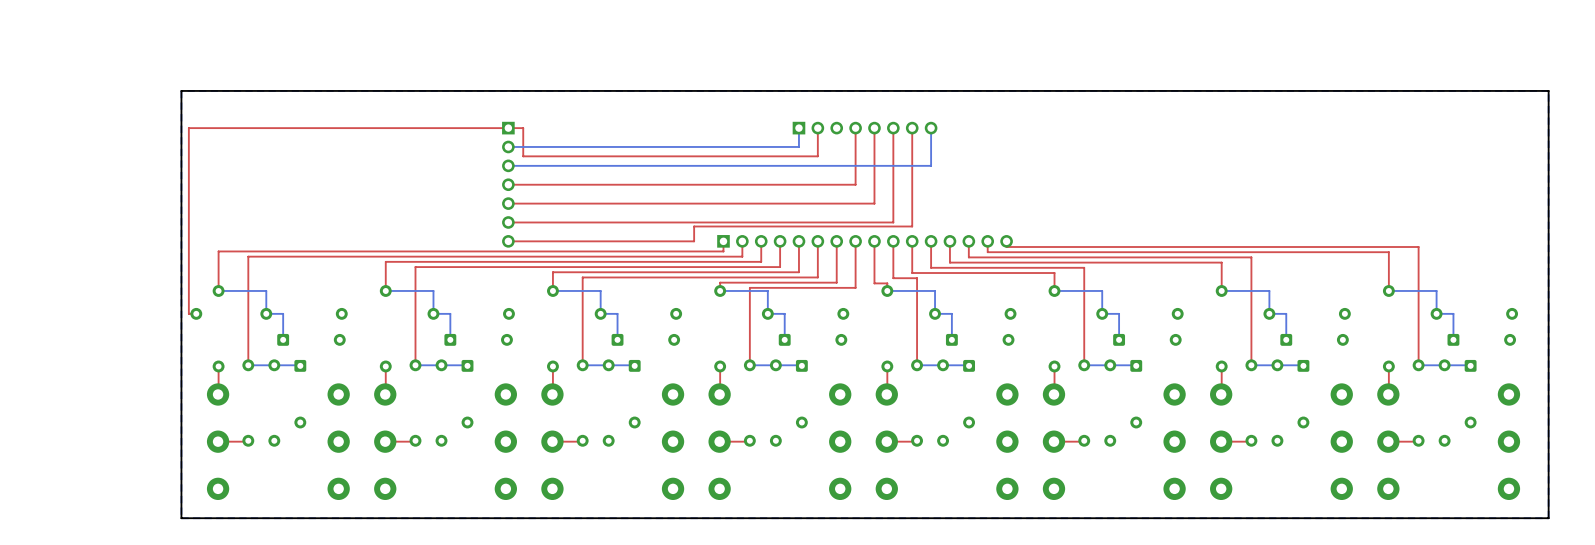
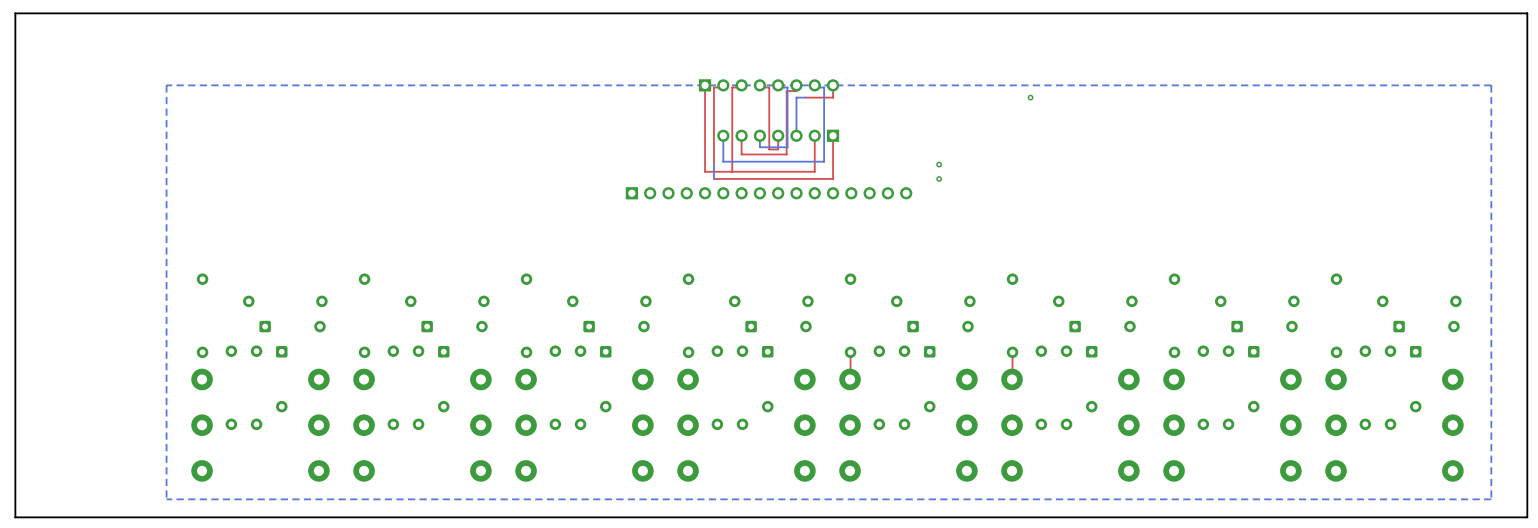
top track: none -> (705, 85) (705, 171) (814, 171) (814, 135)
top track: none -> (723, 85) (723, 87) (713, 87) (713, 164)
top track: none -> (741, 85) (741, 87) (732, 87) (732, 171)
top track: none -> (759, 85) (759, 87) (769, 87) (769, 149) (778, 149) (778, 135)
bottom track: none -> (778, 85) (778, 87) (787, 87) (787, 147) (759, 147) (759, 135)
top track: none -> (796, 85) (796, 91) (786, 91) (786, 154) (741, 154) (741, 135)
bottom track: none -> (814, 85) (814, 87) (824, 87) (824, 161) (723, 161) (723, 135)
top track: none -> (833, 85) (833, 97) (805, 97)
board edge: (1548, 90) (181, 90) (181, 518) (1548, 518) (1548, 90) -> (1527, 13) (1527, 517) (15, 517) (15, 13) (1527, 13)
bottom track: none -> (805, 97) (796, 97) (796, 135)
via: none -> (1030, 97)
bottom track: (798, 128) (798, 146) (508, 146) -> none
top track: (817, 128) (817, 156) (523, 156) (523, 128) (188, 128) (188, 313) (196, 313) -> none
top track: (855, 128) (855, 184) (508, 184) -> none
part position: (865, 128) -> (769, 85)
top track: (874, 128) (874, 203) (508, 203) -> none
top track: (893, 128) (893, 222) (508, 222) -> none
top track: (912, 128) (912, 226) (694, 226) (694, 241) (508, 241) -> none
bottom track: (931, 128) (931, 165) (508, 165) -> none
part: none -> (778, 135)
top track: none -> (833, 135) (833, 178) (713, 178)
bottom track: none -> (713, 164) (713, 178)
via: none -> (939, 164)
part: (508, 184) -> none
via: none -> (939, 178)
top track: (723, 241) (723, 251) (218, 251) (218, 290) -> none
top track: (742, 241) (742, 256) (248, 256) (248, 365) -> none
top track: (761, 241) (761, 261) (385, 261) (385, 290) -> none
top track: (780, 241) (780, 267) (415, 267) (415, 365) -> none
top track: (798, 241) (798, 272) (552, 272) (552, 290) -> none
top track: (817, 241) (817, 277) (582, 277) (582, 365) -> none
top track: (836, 241) (836, 282) (720, 282) (720, 290) -> none
top track: (855, 241) (855, 287) (749, 287) (749, 365) -> none
part position: (865, 241) -> (769, 193)
top track: (874, 241) (874, 283) (887, 283) (887, 290) -> none
top track: (893, 241) (893, 278) (917, 278) (917, 365) -> none
top track: (912, 241) (912, 273) (1054, 273) (1054, 290) -> none
top track: (931, 241) (931, 267) (1084, 267) (1084, 365) -> none
top track: (949, 241) (949, 262) (1221, 262) (1221, 290) -> none
top track: (968, 241) (968, 257) (1251, 257) (1251, 365) -> none
top track: (987, 241) (987, 252) (1388, 252) (1388, 290) -> none
top track: (1006, 241) (1006, 246) (1418, 246) (1418, 365) -> none
bottom track: (218, 290) (266, 290) (266, 313) (283, 313) (283, 339) -> none
bottom track: (385, 290) (433, 290) (433, 313) (450, 313) (450, 339) -> none
bottom track: (552, 290) (600, 290) (600, 313) (617, 313) (617, 339) -> none
bottom track: (720, 290) (767, 290) (767, 313) (784, 313) (784, 339) -> none
bottom track: (887, 290) (935, 290) (935, 313) (951, 313) (951, 339) -> none
bottom track: (1054, 290) (1102, 290) (1102, 313) (1119, 313) (1119, 339) -> none
bottom track: (1221, 290) (1269, 290) (1269, 313) (1286, 313) (1286, 339) -> none
bottom track: (1388, 290) (1436, 290) (1436, 313) (1453, 313) (1453, 339) -> none
part: (196, 313) -> none
bottom track: (248, 365) (300, 365) -> none
bottom track: (415, 365) (467, 365) -> none
bottom track: (582, 365) (634, 365) -> none
bottom track: (749, 365) (801, 365) -> none
bottom track: (917, 365) (969, 365) -> none
bottom track: (1084, 365) (1136, 365) -> none
bottom track: (1251, 365) (1303, 365) -> none
bottom track: (1418, 365) (1470, 365) -> none
top track: (218, 366) (218, 394) -> none
top track: (385, 366) (385, 394) -> none
top track: (552, 366) (552, 394) -> none
top track: (720, 366) (719, 394) -> none
top track: (1221, 366) (1221, 394) -> none
top track: (1388, 366) (1388, 394) -> none
top track: (248, 440) (218, 441) -> none
top track: (415, 440) (385, 441) -> none
top track: (582, 440) (552, 441) -> none
top track: (749, 440) (719, 441) -> none
top track: (917, 440) (886, 441) -> none
top track: (1084, 440) (1053, 441) -> none
top track: (1251, 440) (1221, 441) -> none
top track: (1418, 440) (1388, 441) -> none

